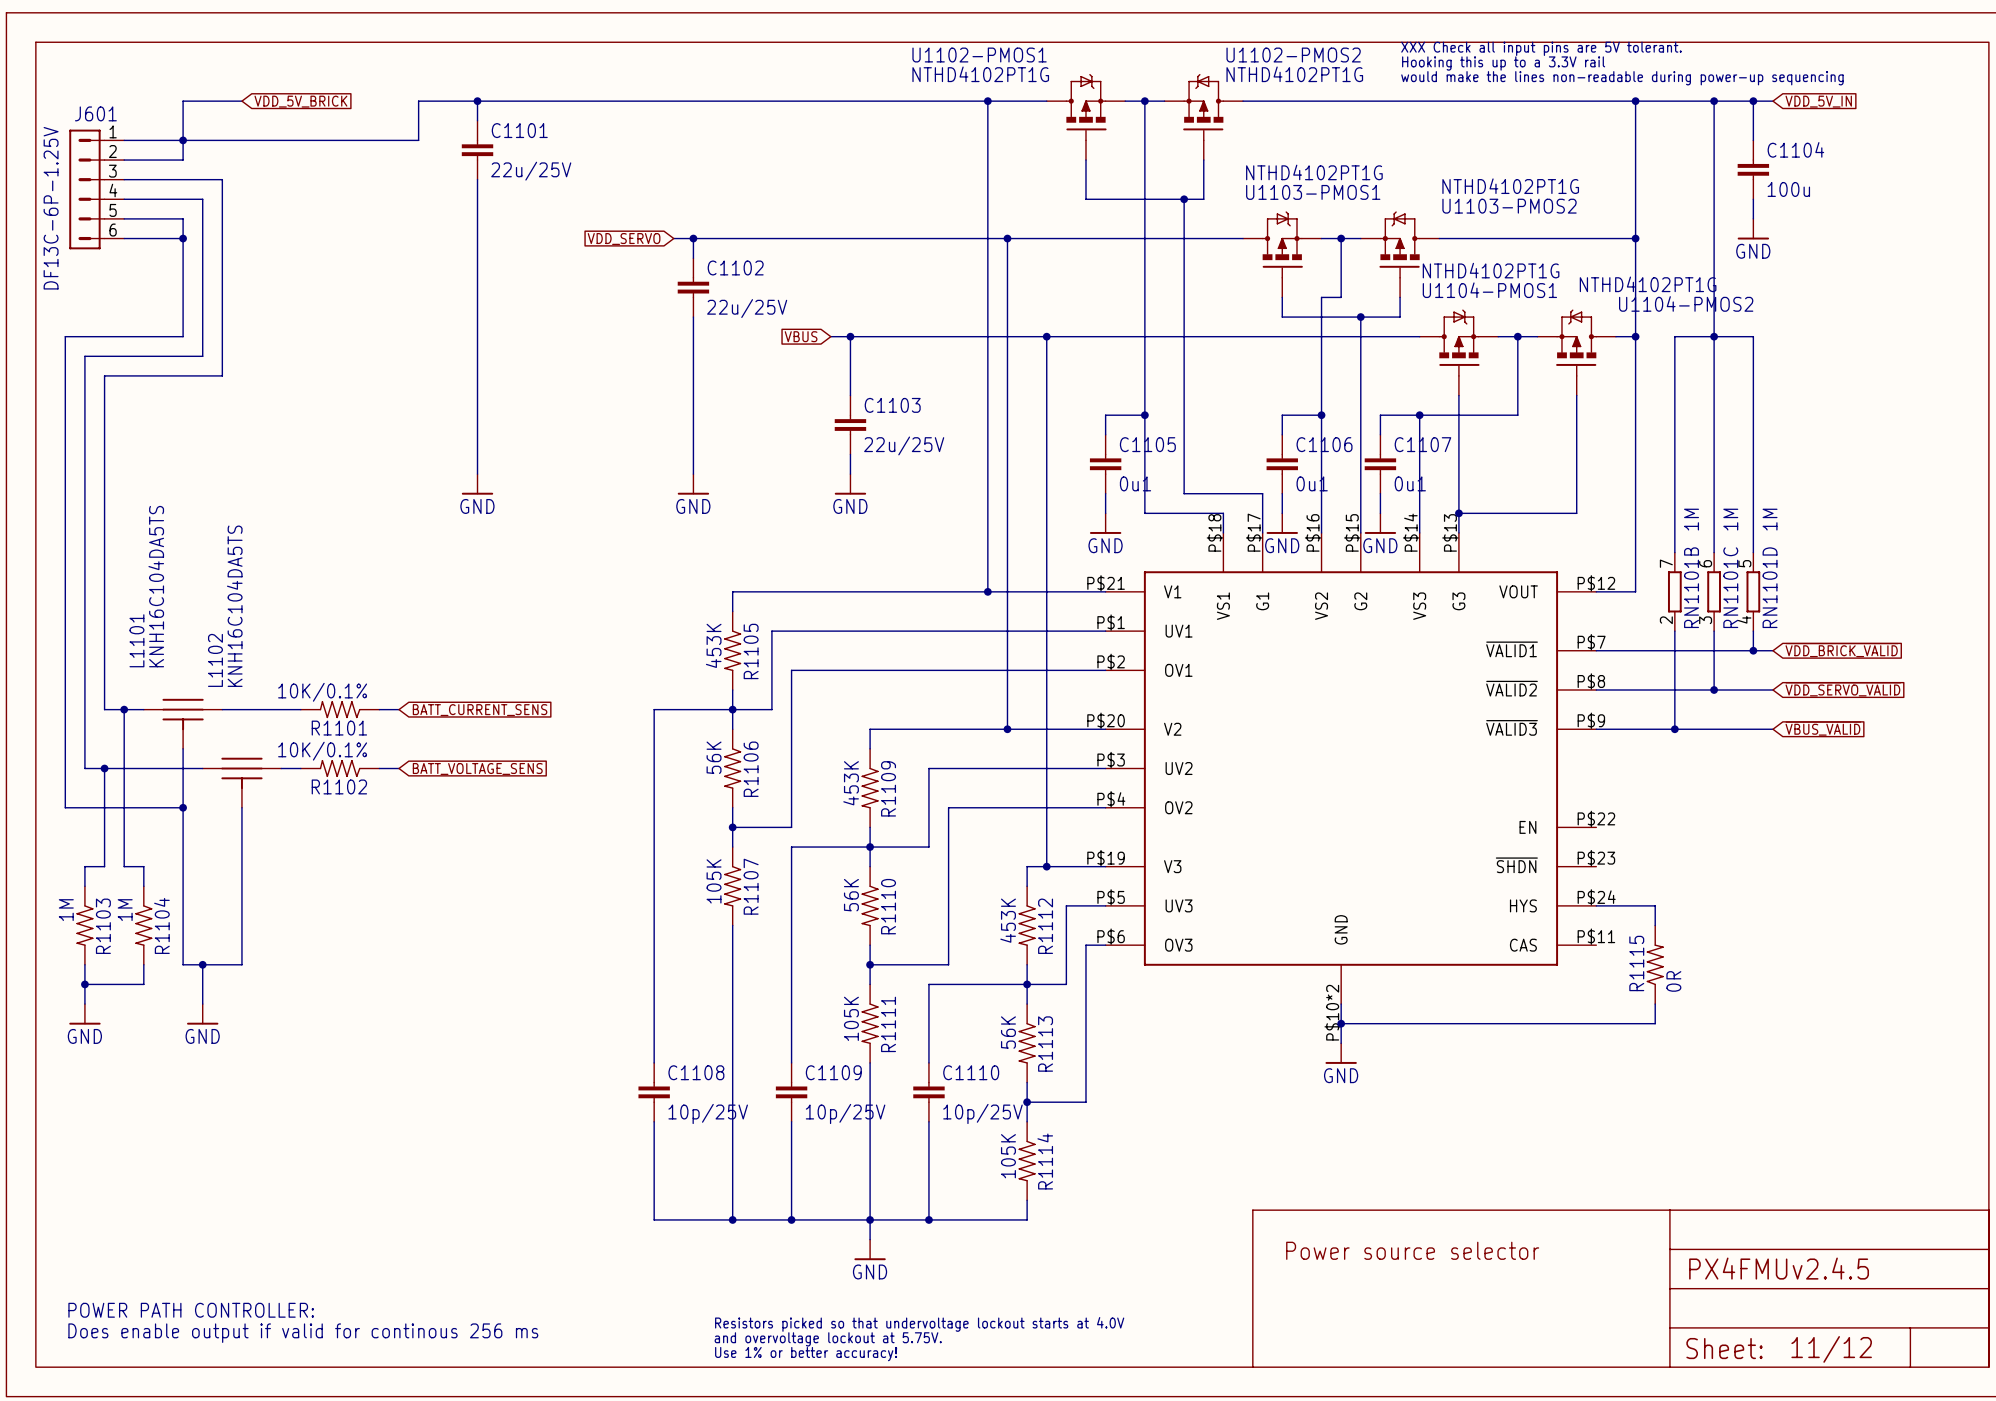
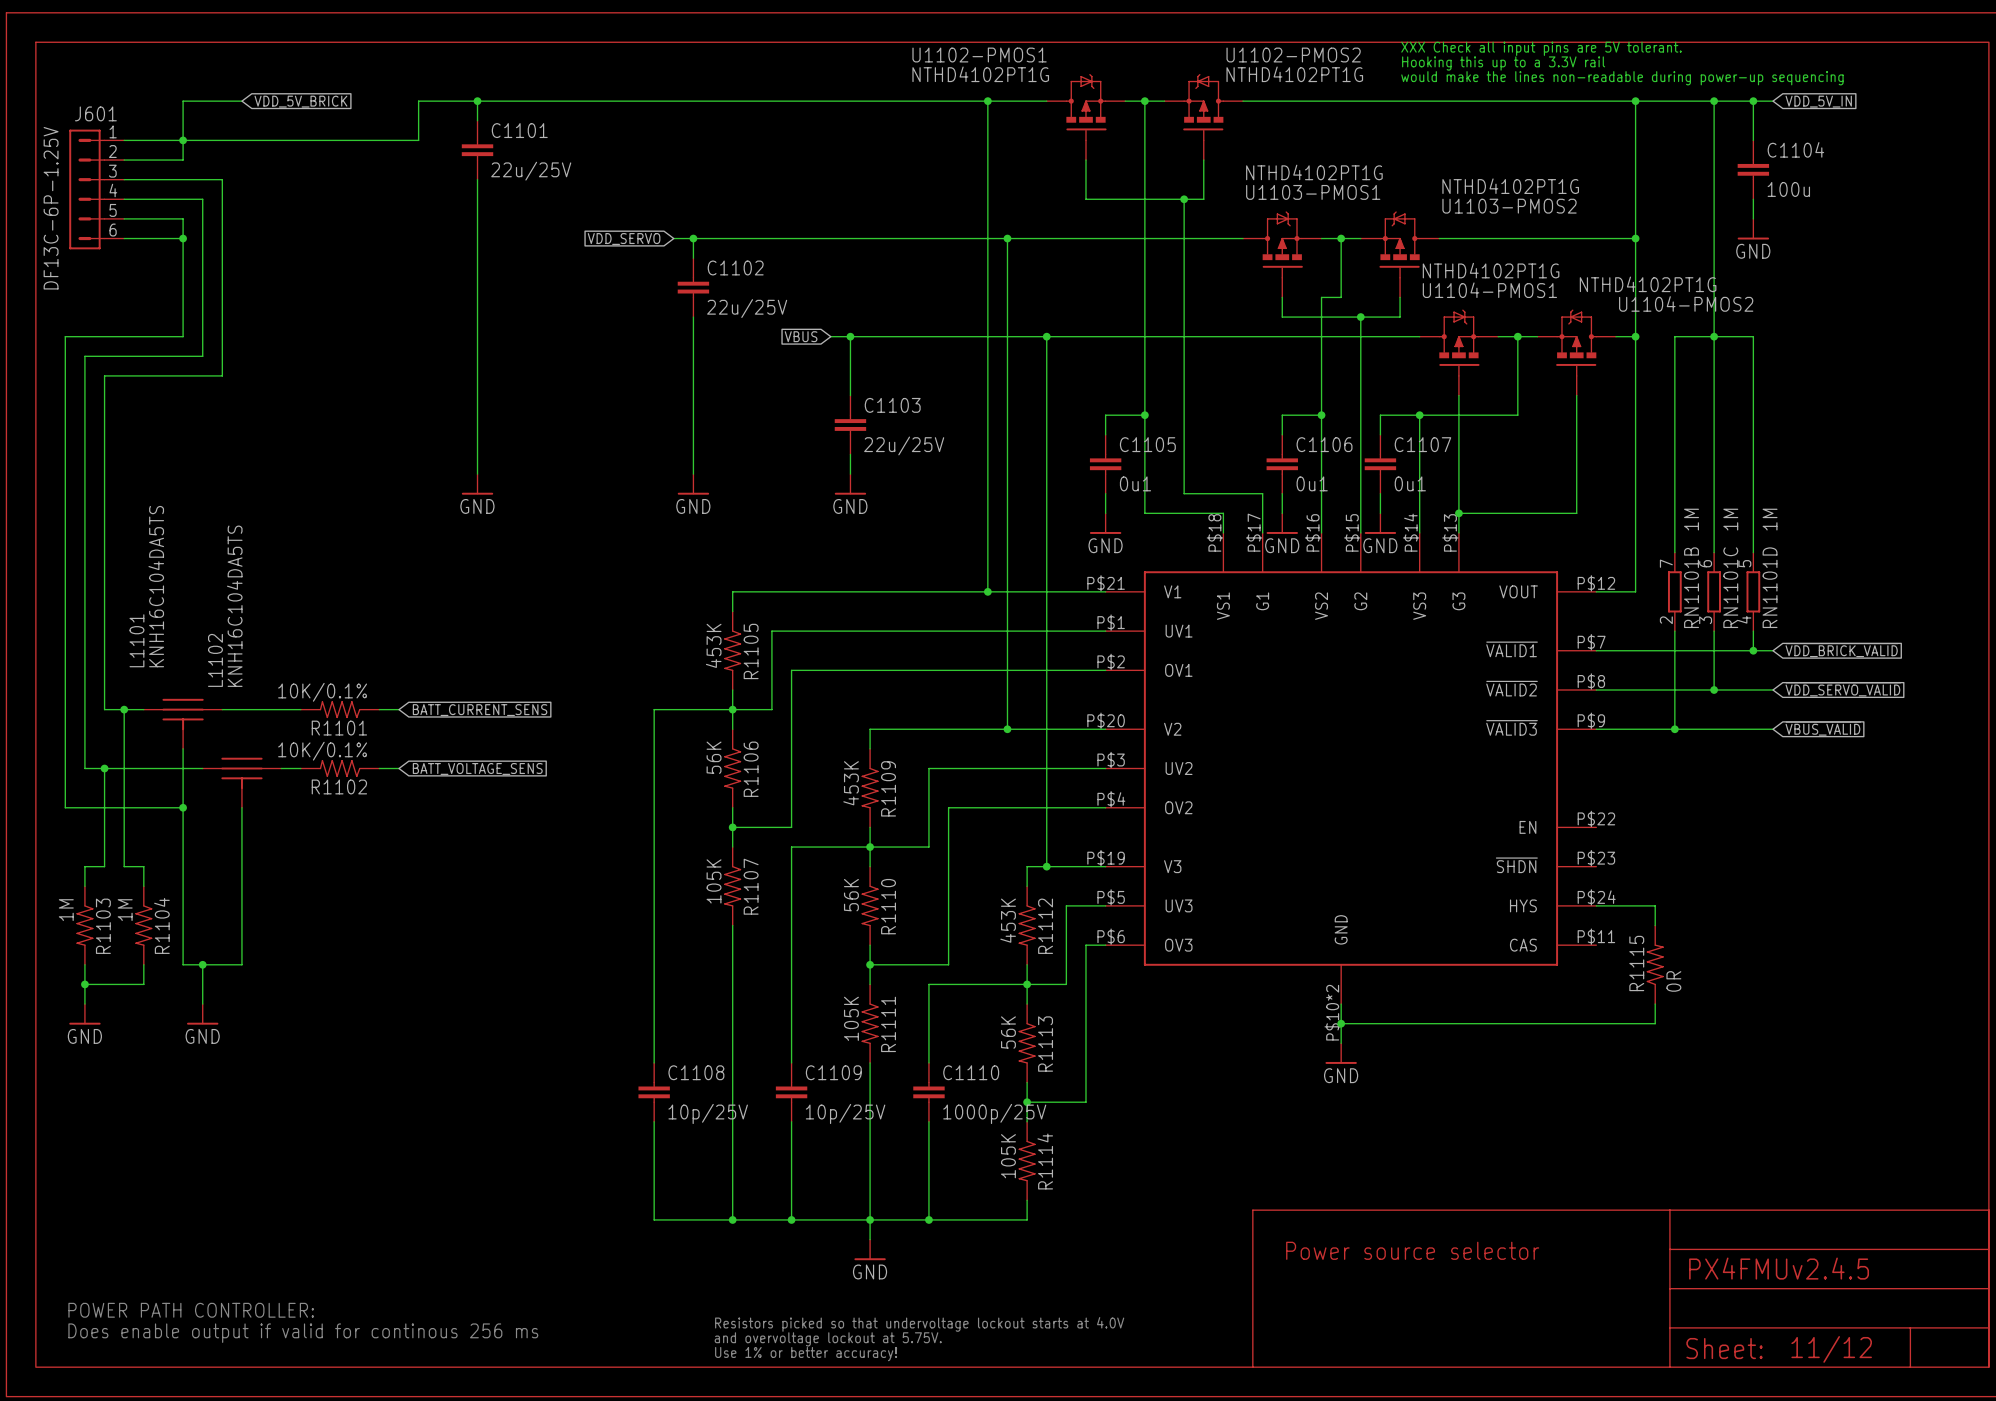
C1110 value: 10p/25V (982, 1113) -> 1000p/25V (994, 1113)

